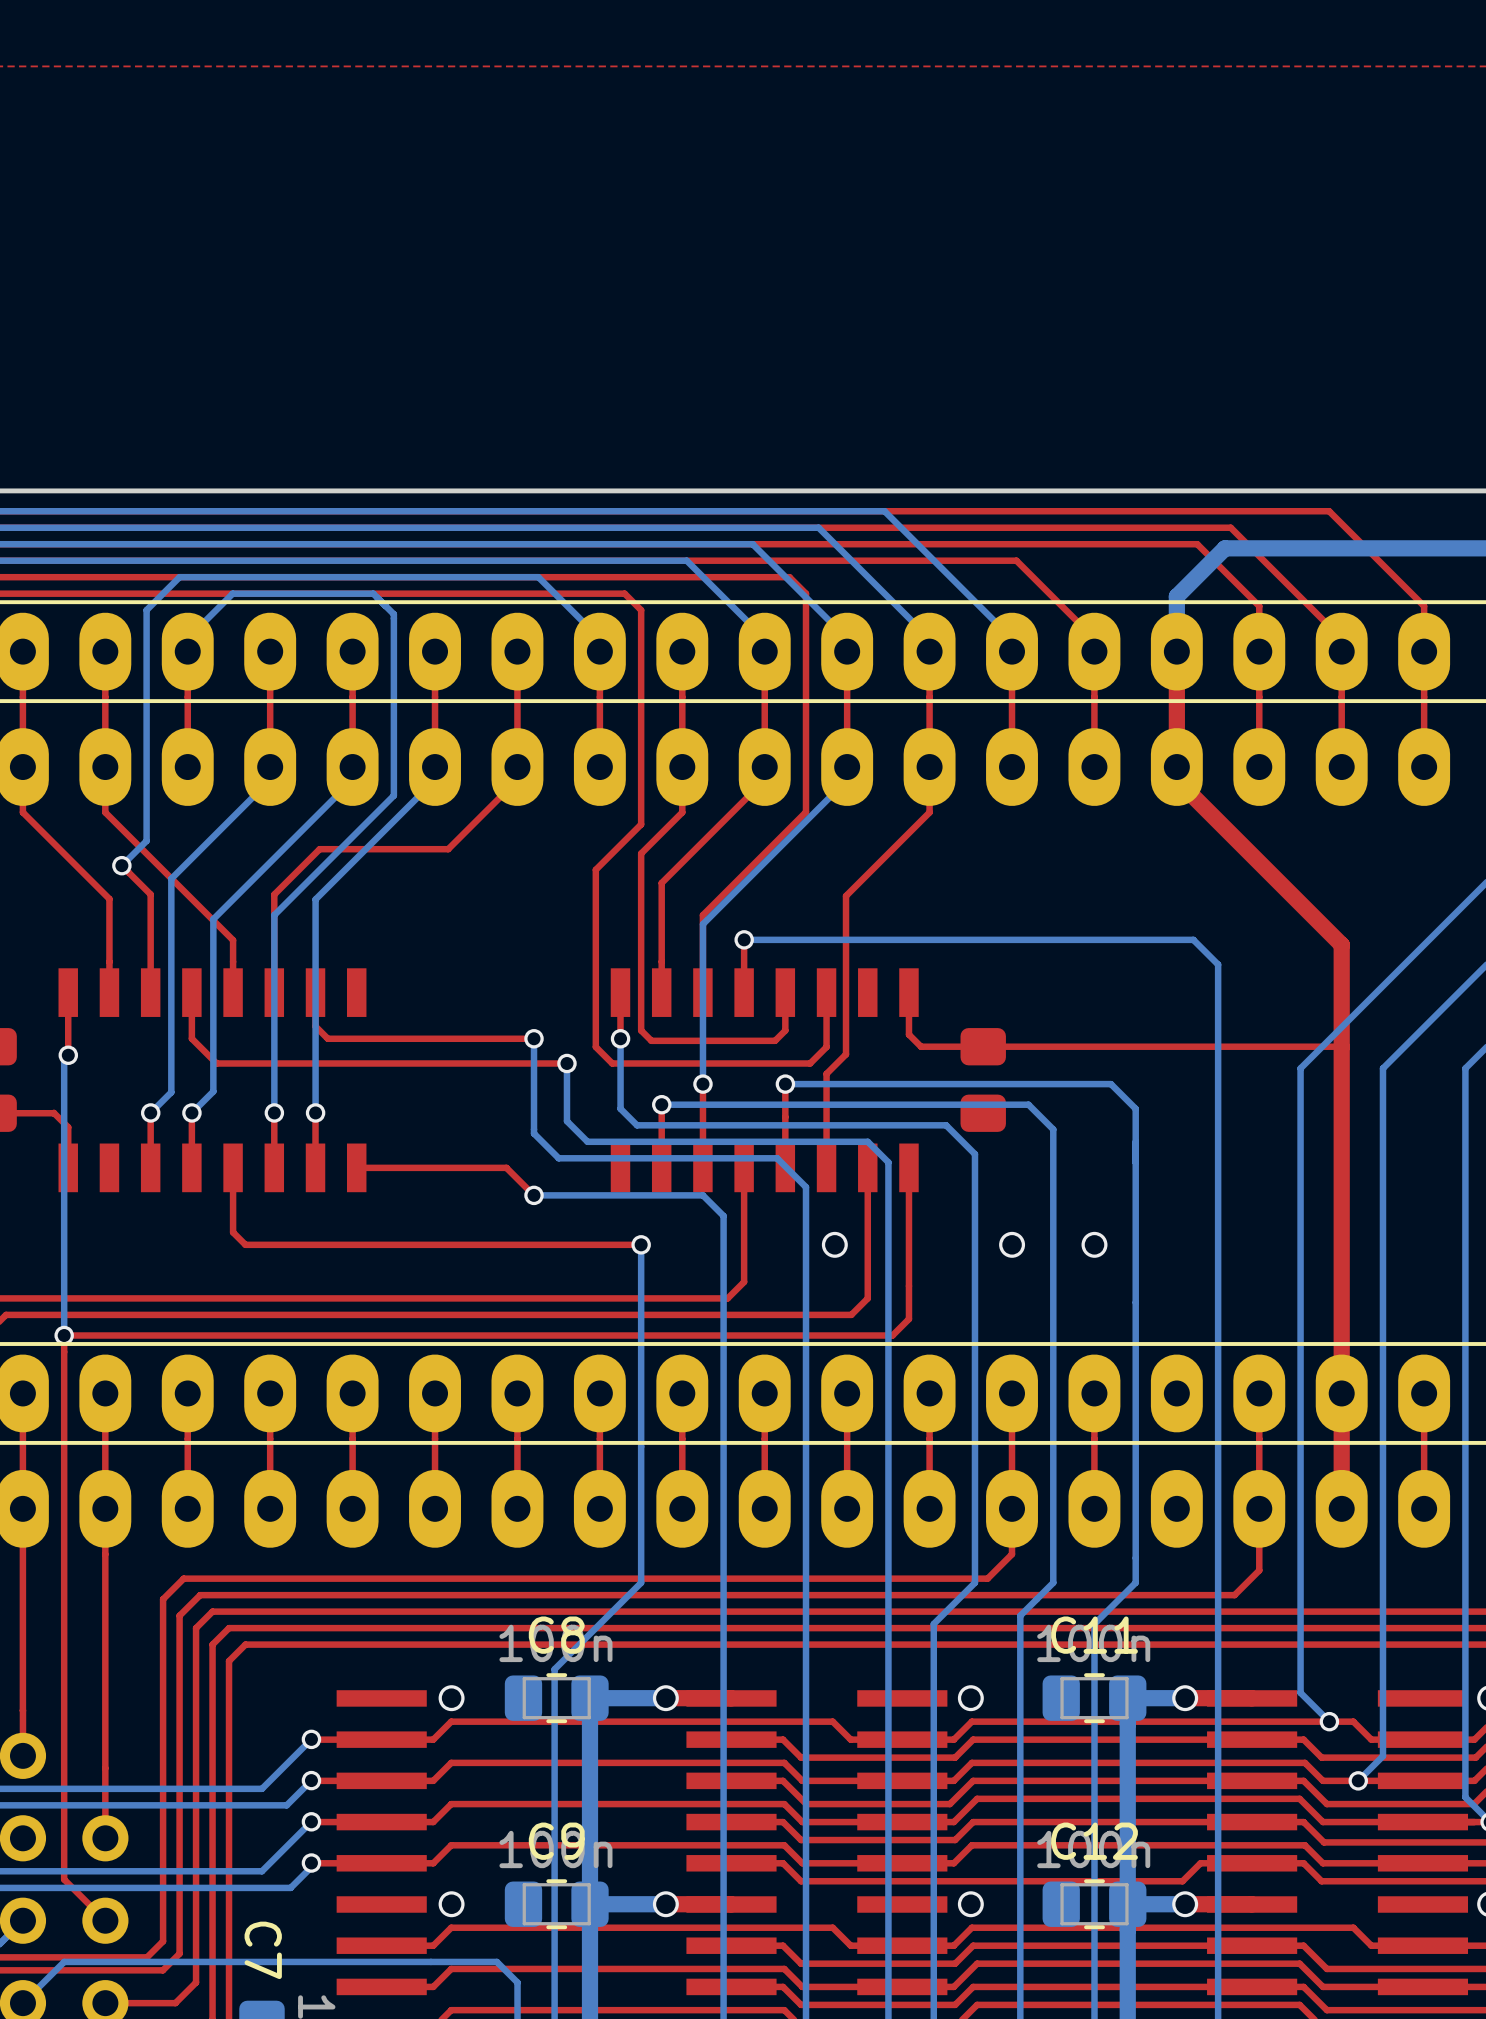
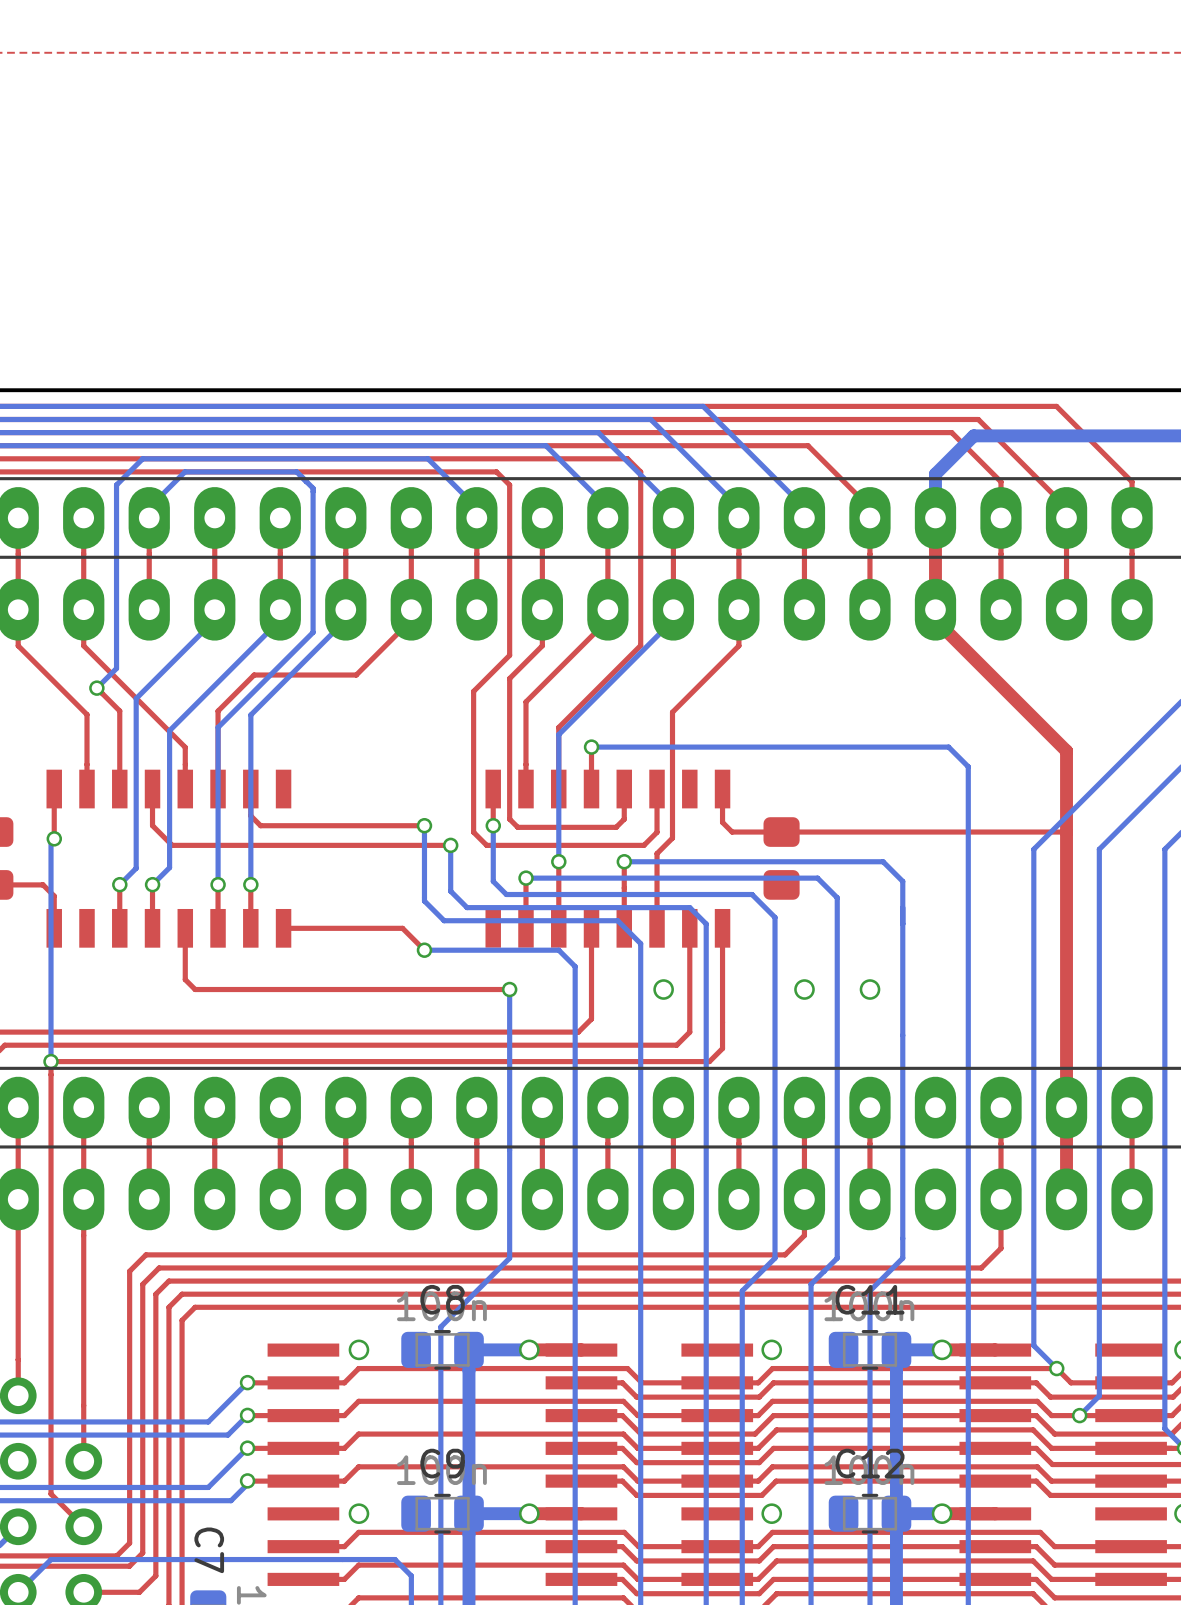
top track: (789, 1721) (832, 1721) (850, 1739) -> (627, 1368) (641, 1382) (676, 1382)
top track: (1329, 1721) (1353, 1721) (1371, 1739) -> (1056, 1368) (1071, 1382) (1090, 1382)
top track: (1200, 1863) (1182, 1881) (958, 1881) -> (954, 1481) (776, 1481) (761, 1495)
top track: (785, 1927) (832, 1927) (850, 1945) -> (624, 1532) (638, 1546) (676, 1546)
top track: (1308, 1927) (1353, 1927) (1371, 1945) -> (1040, 1532) (1054, 1546) (1090, 1546)

